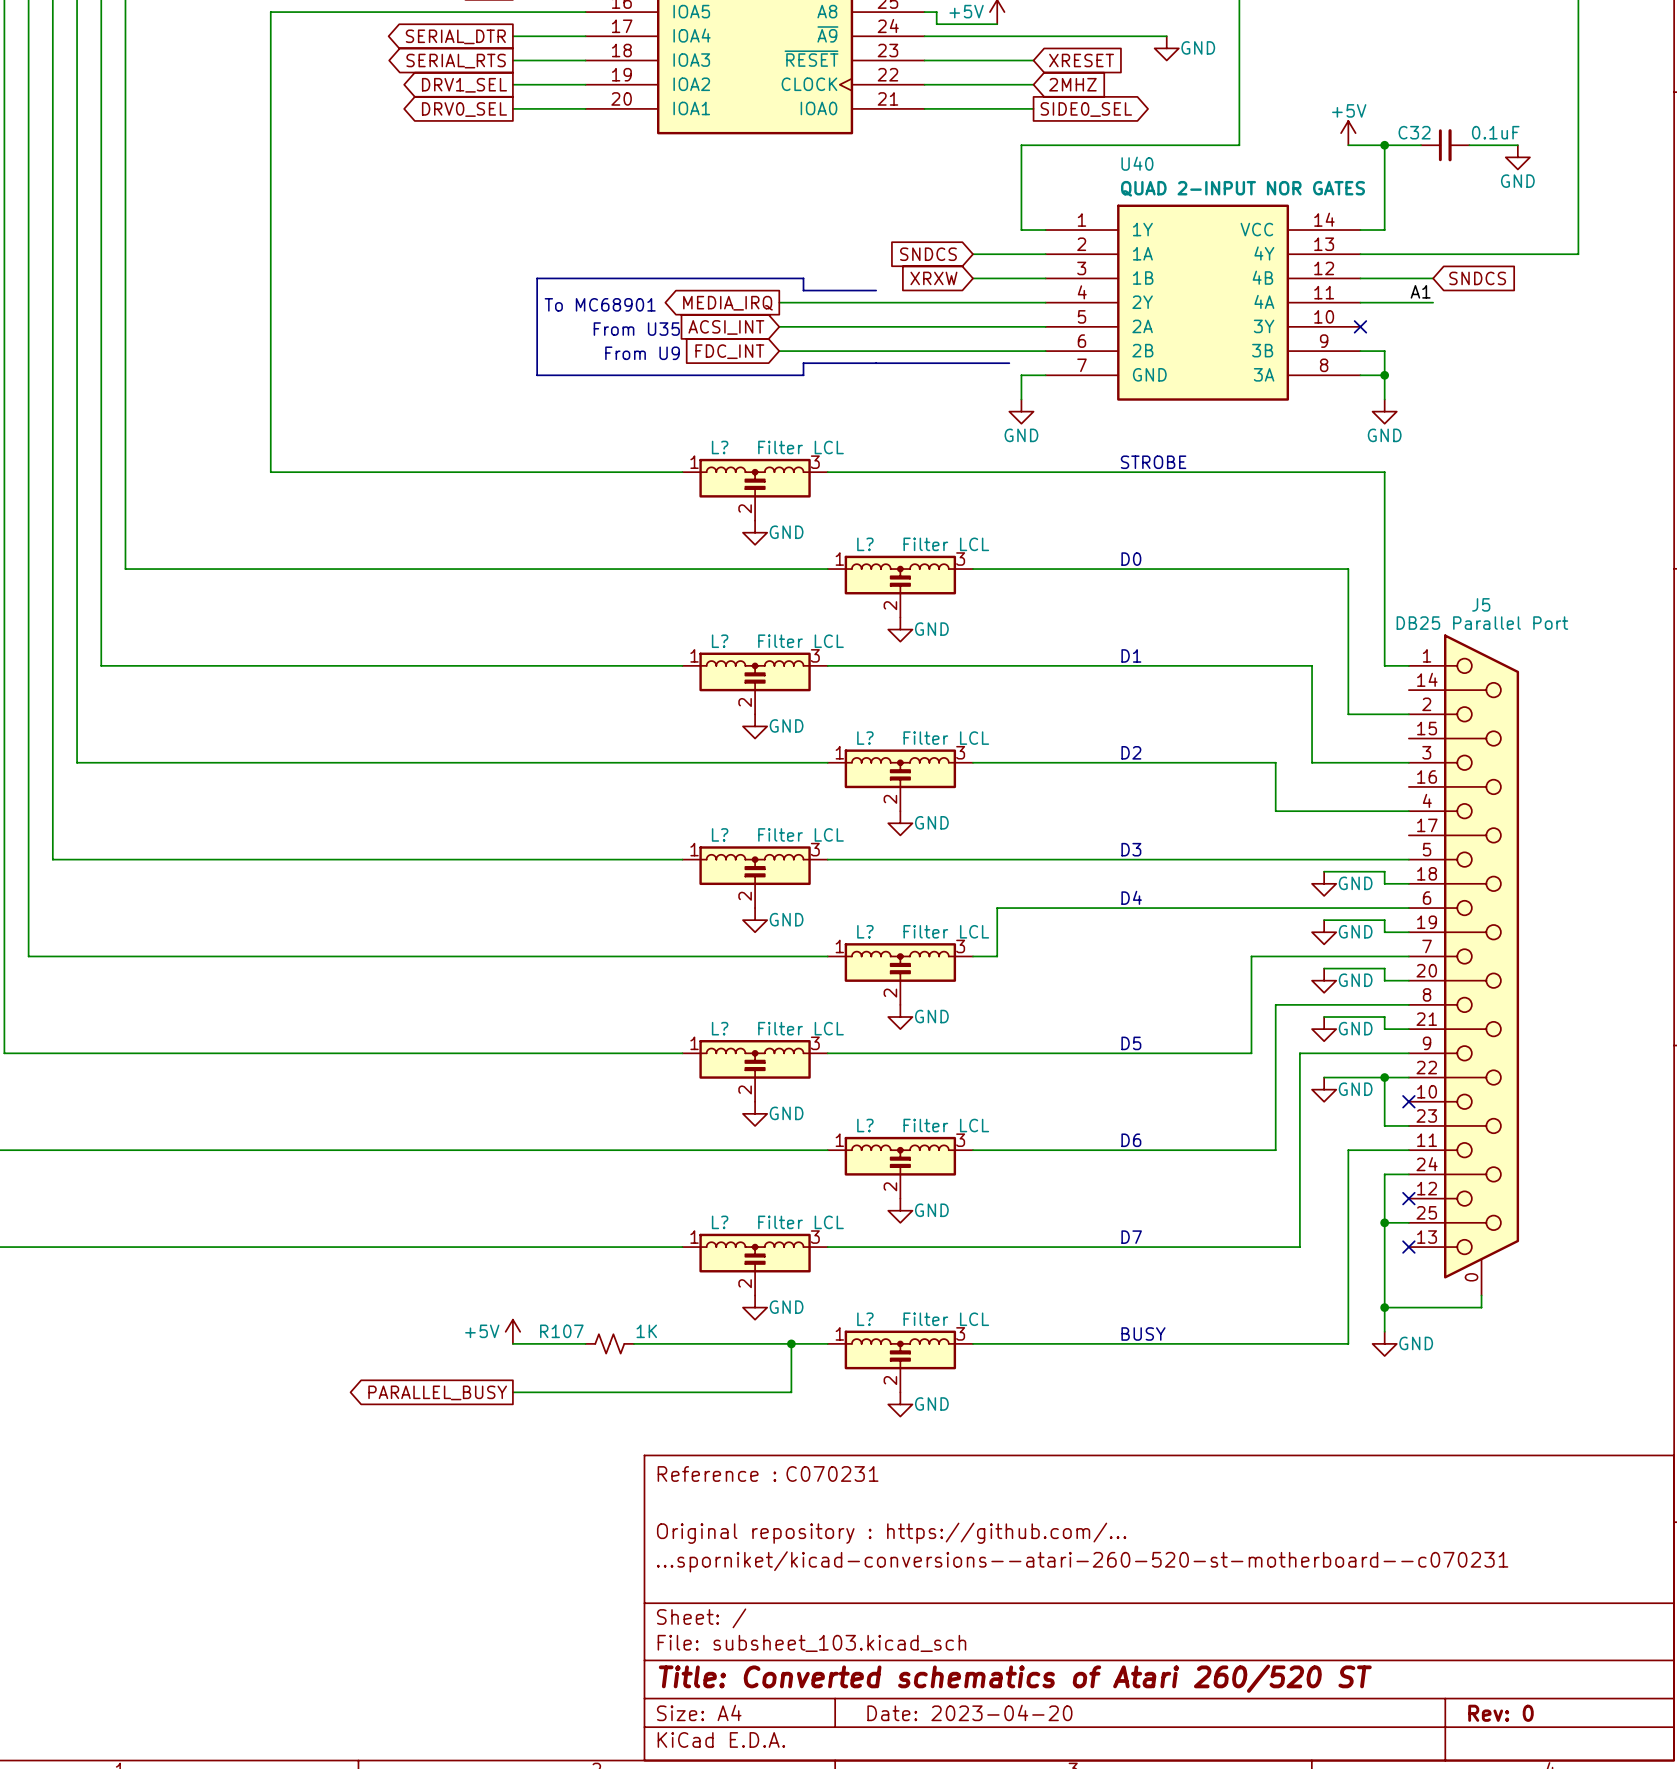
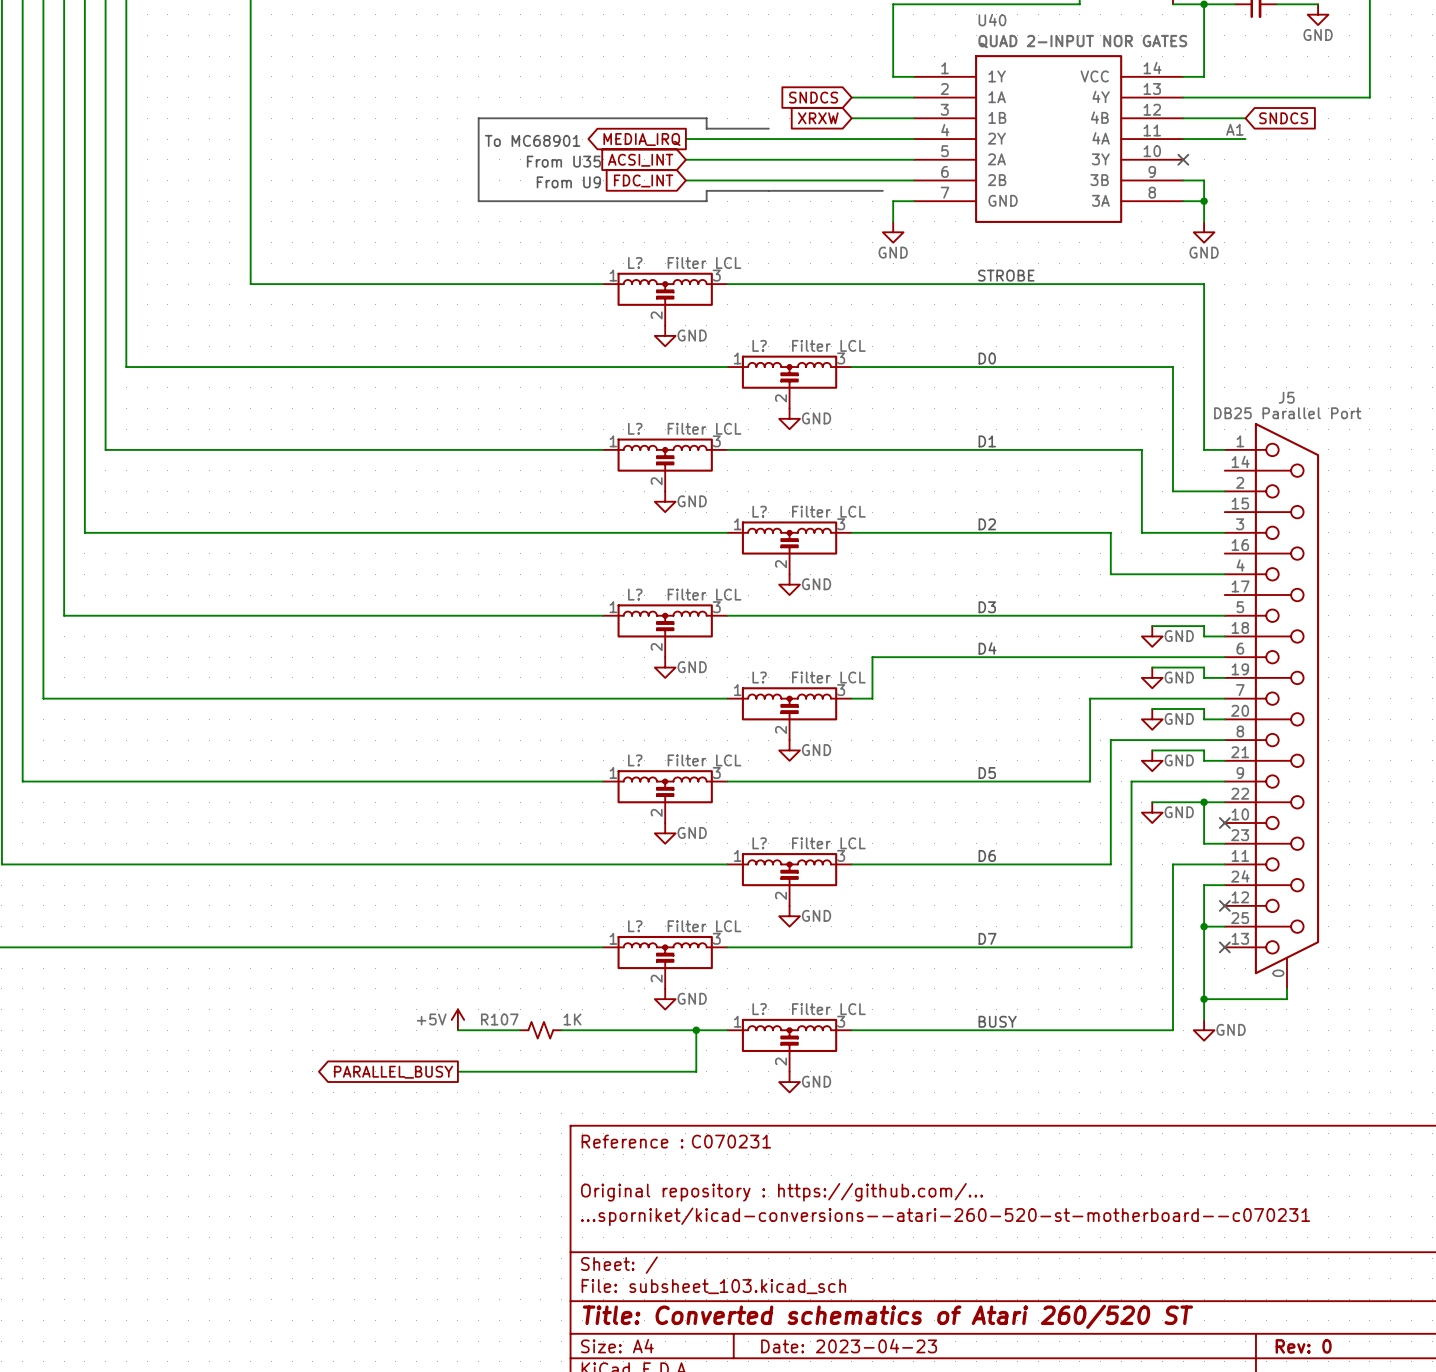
title block: Date: 2023-04-20 (969, 1712) -> Date: 2023-04-23 (849, 1346)

